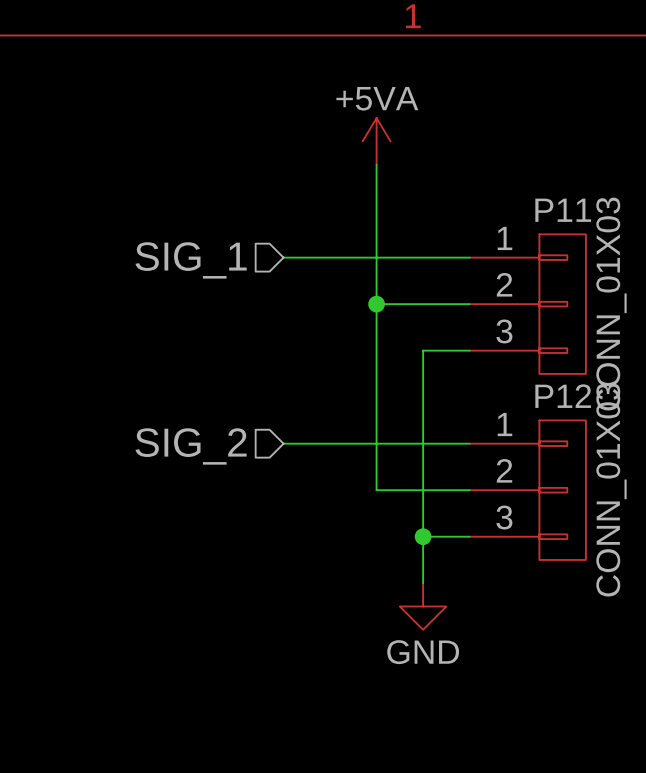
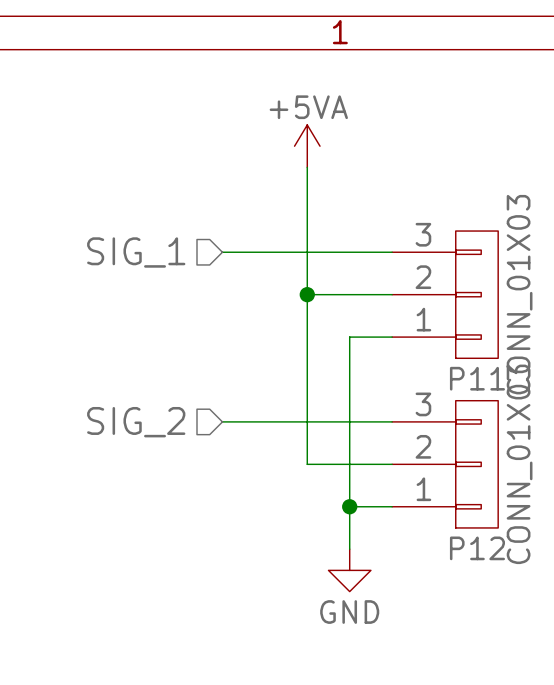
P11 flip: as is (562, 304) -> up-down (476, 294)
P12 flip: as is (562, 490) -> up-down (476, 464)

